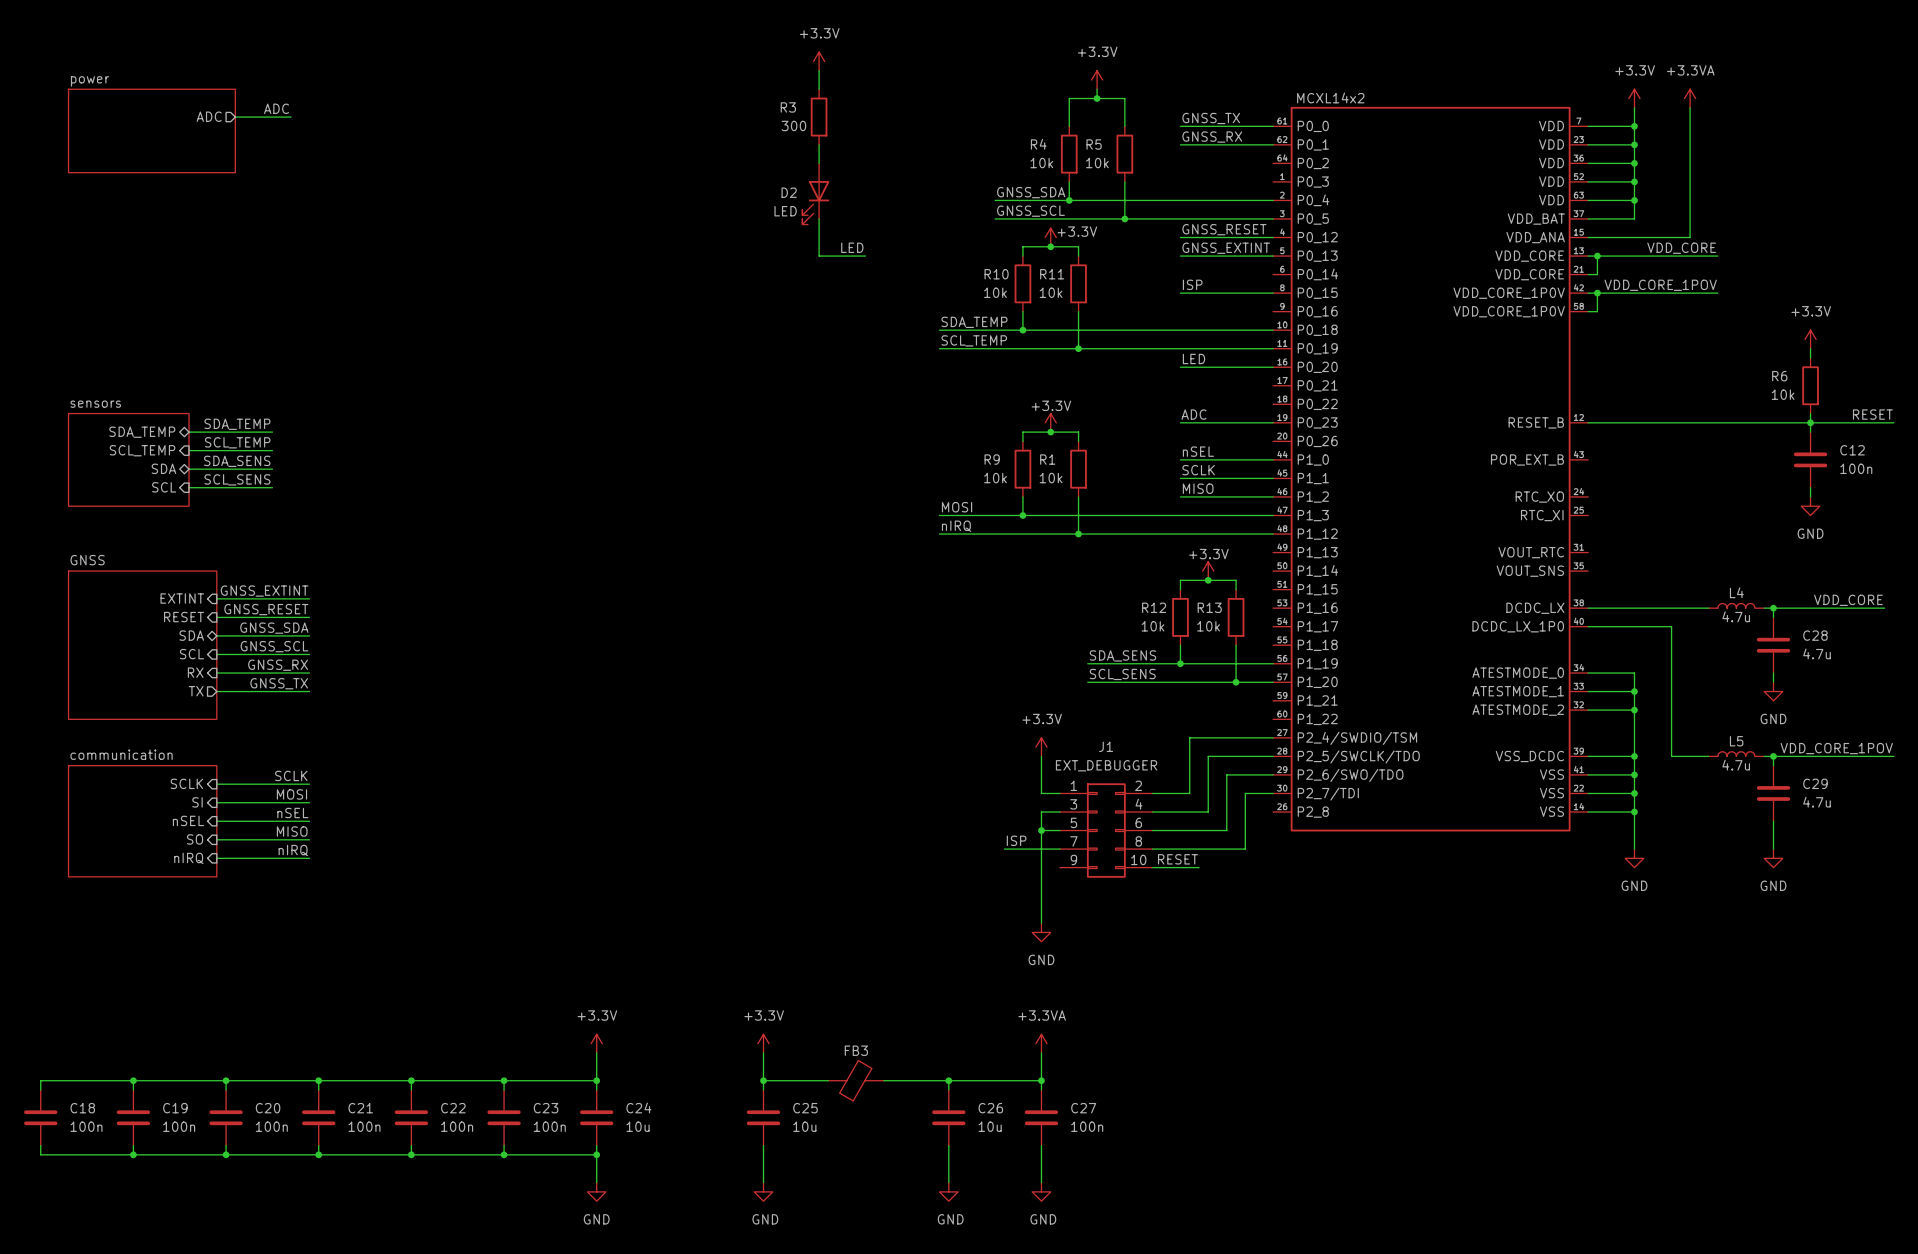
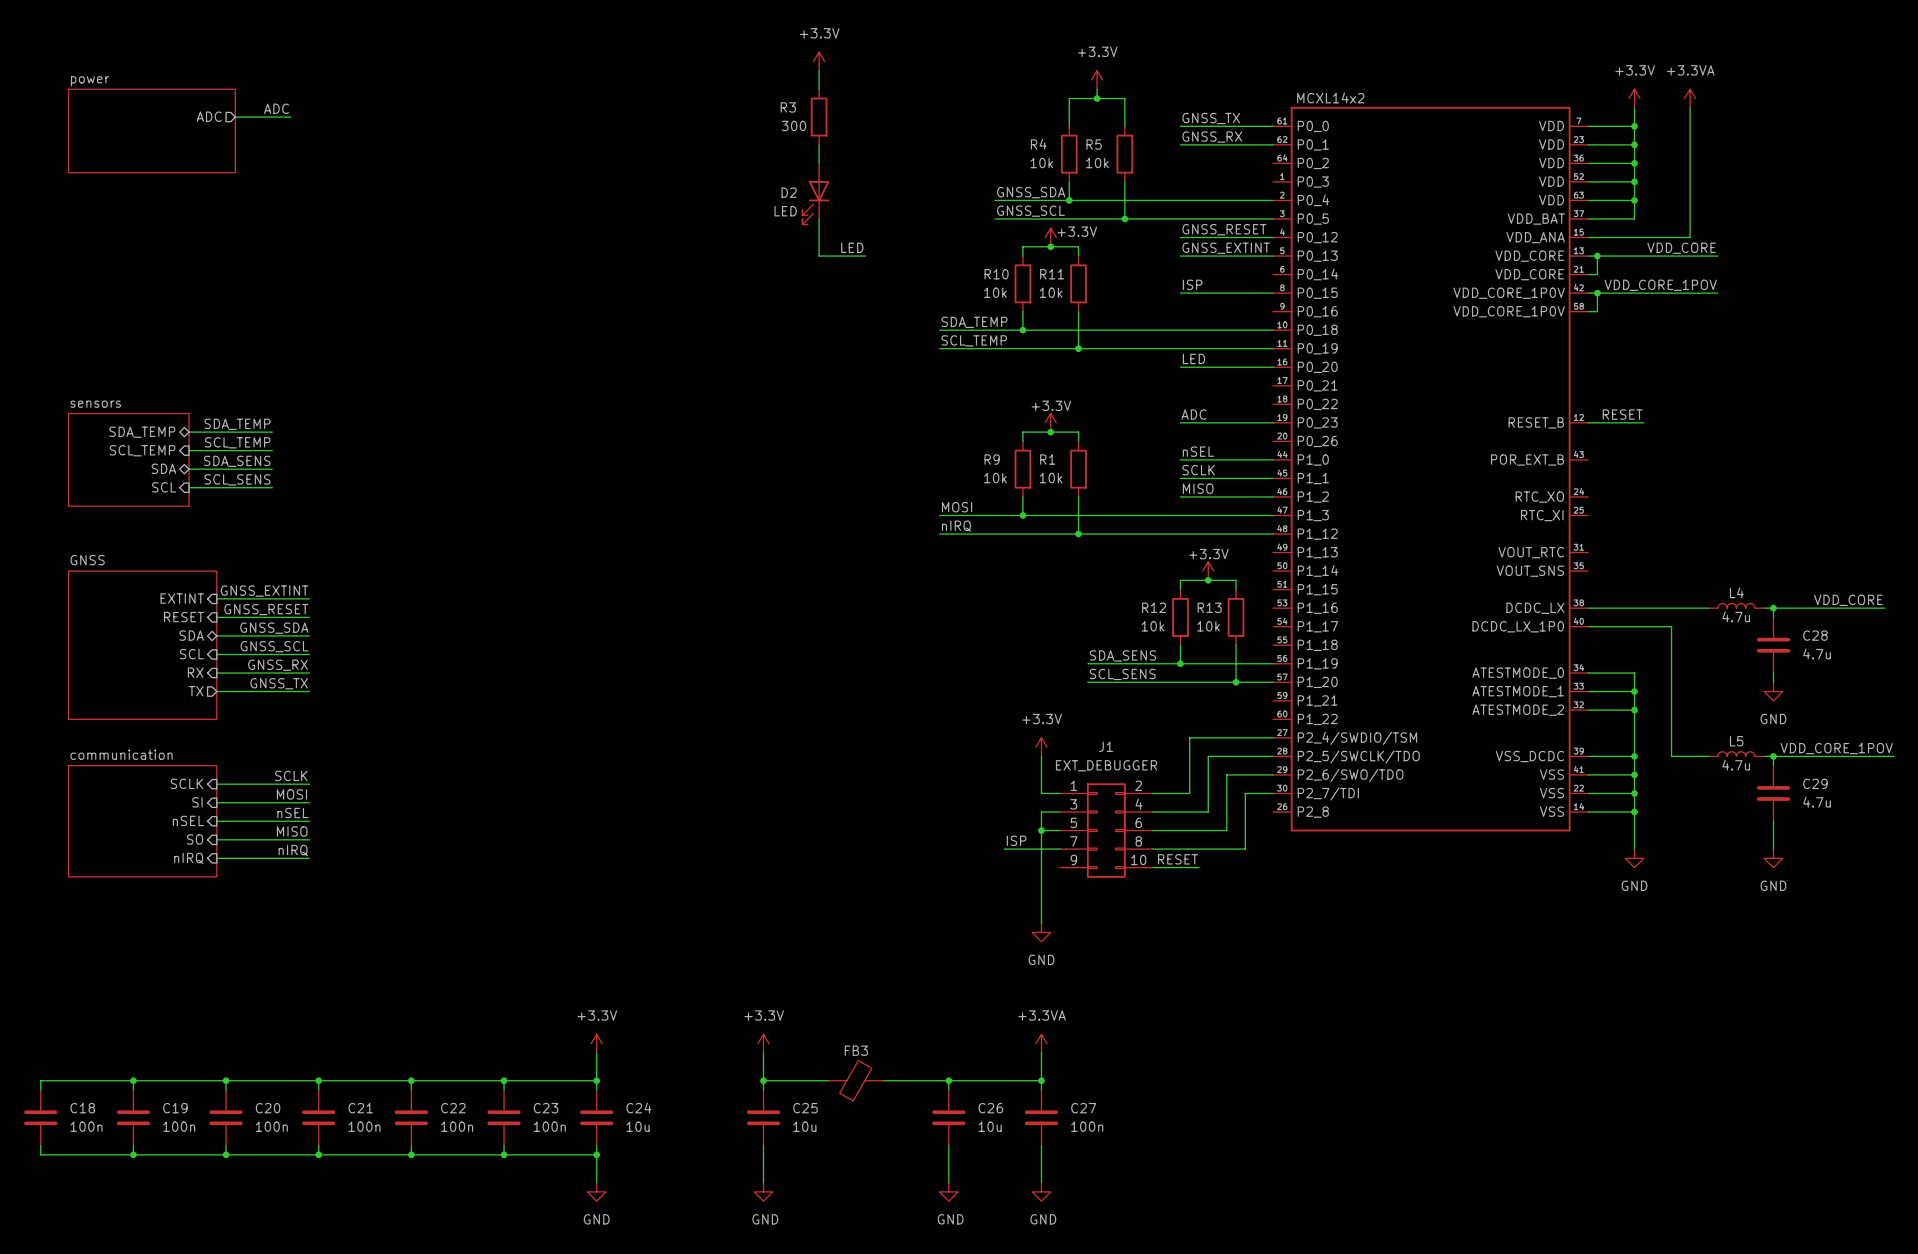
power symbol: +3.3V (1810, 339) -> none
wire: (1810, 348) (1810, 357) -> none
R6: 10k (1810, 385) -> none
wire: (1810, 413) (1810, 432) -> none
label: none -> RESET (1622, 414)
label: RESET (1872, 414) -> none
wire: (1643, 422) (1893, 422) -> none
junction: (1810, 422) -> none
C12: 100n (1810, 459) -> none
wire: (1810, 487) (1810, 496) -> none
power symbol: GND (1810, 506) -> none

